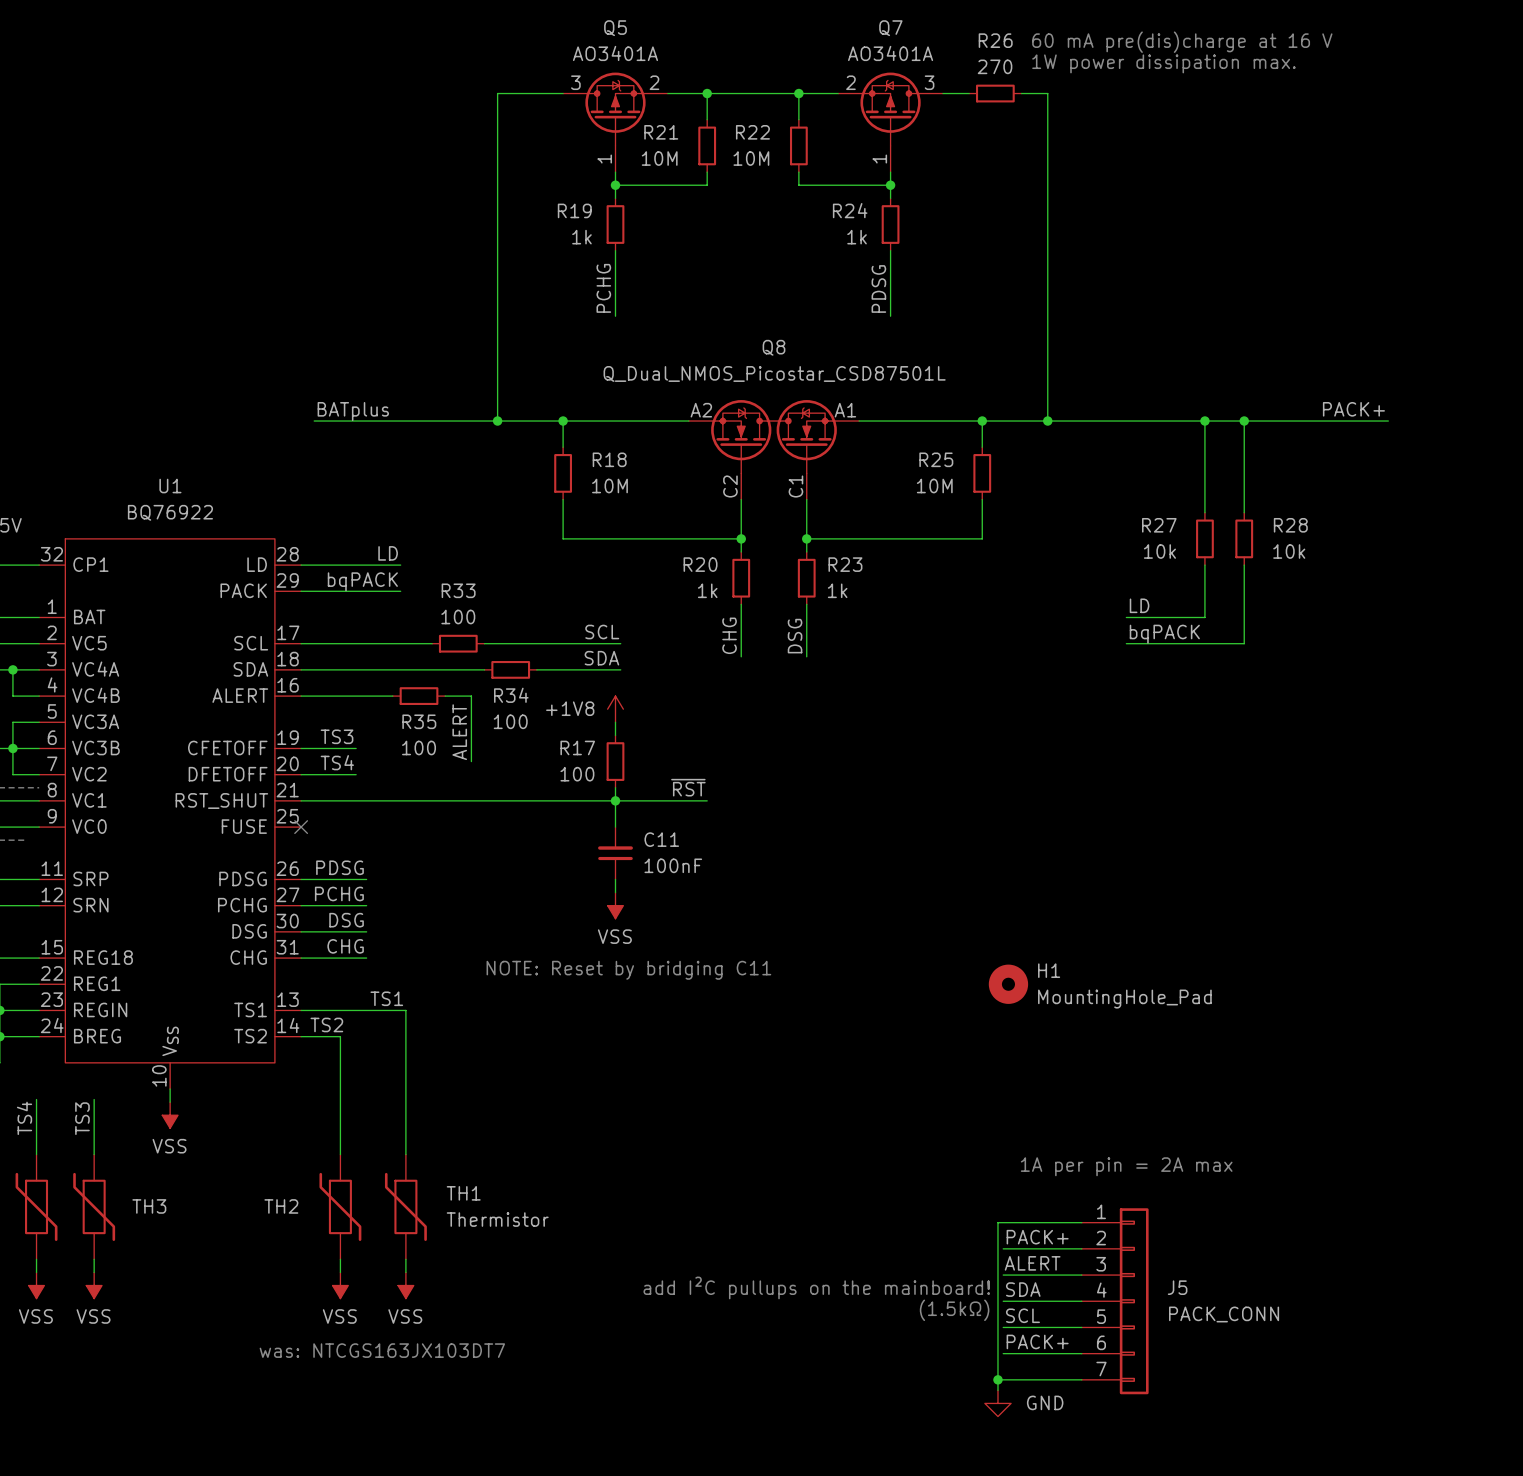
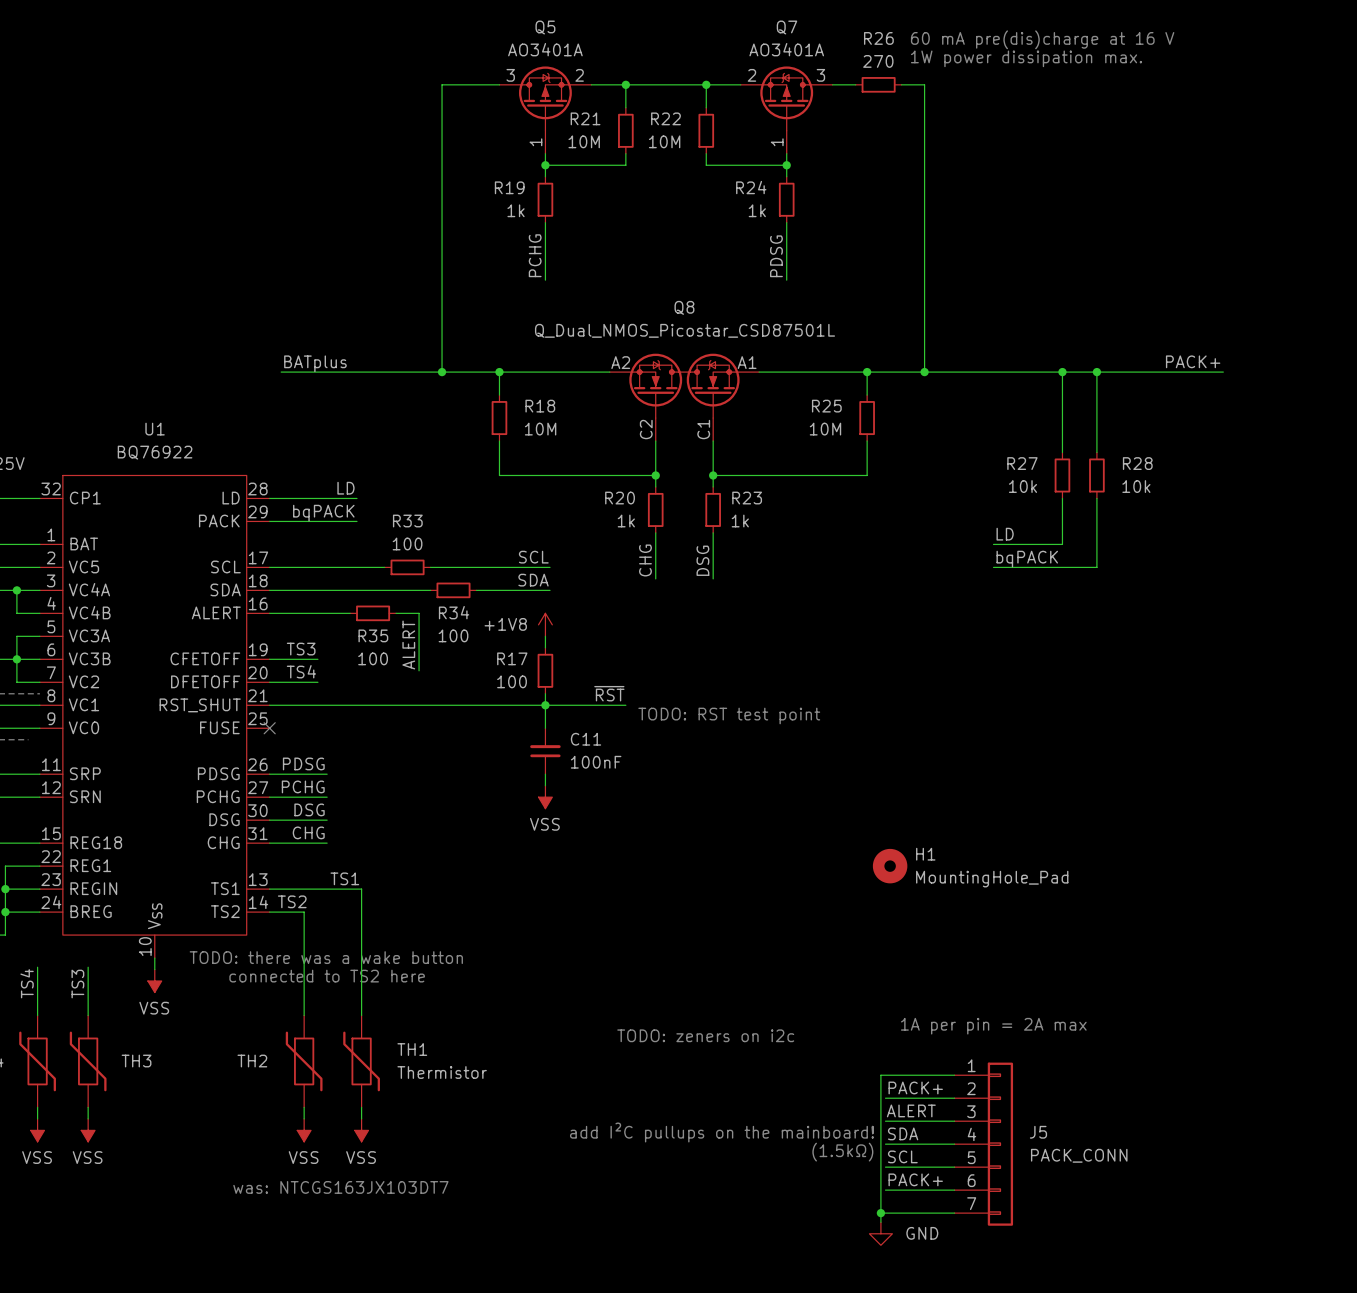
text: none -> TODO: RST test point (729, 715)
text: NOTE: Reset by bridging C11 (628, 970) -> none
text: none -> TODO: there was a wake button (326, 957)
text: none -> connected to TS2 here (327, 976)
text: none -> TODO: zeners on i2c (705, 1035)

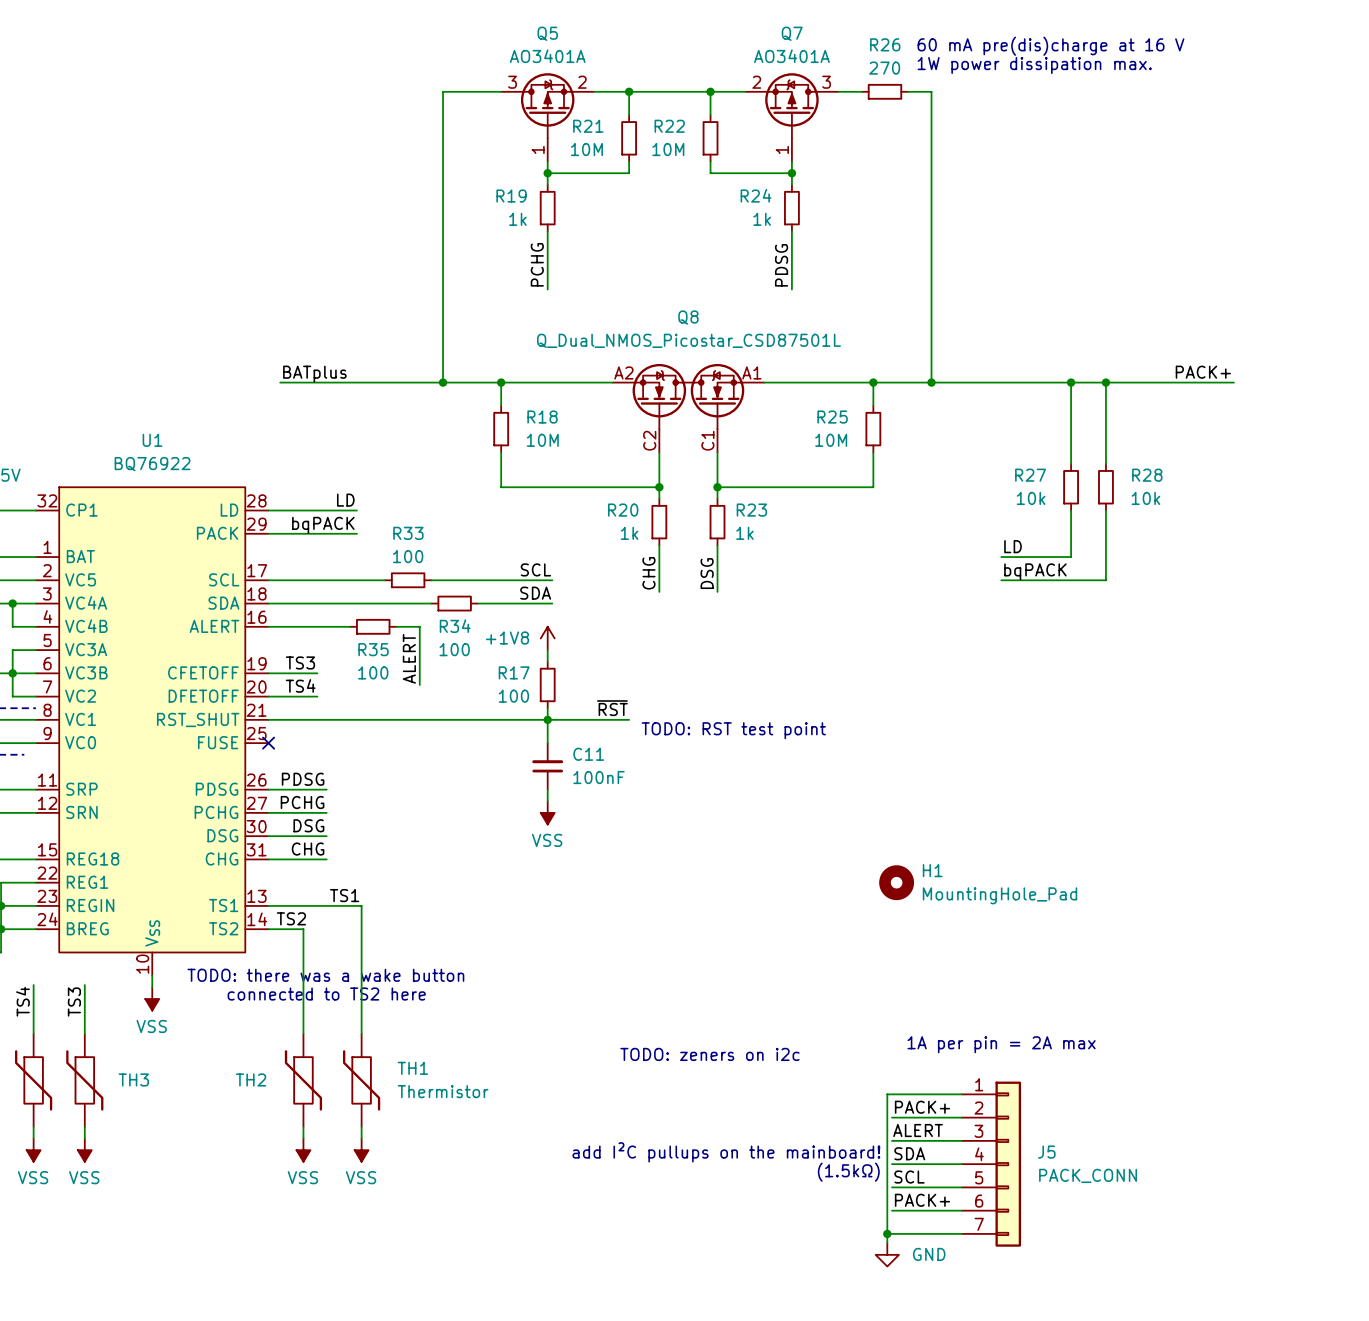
text: was: NTCGS163JX103DT7 (340, 1187) -> none

